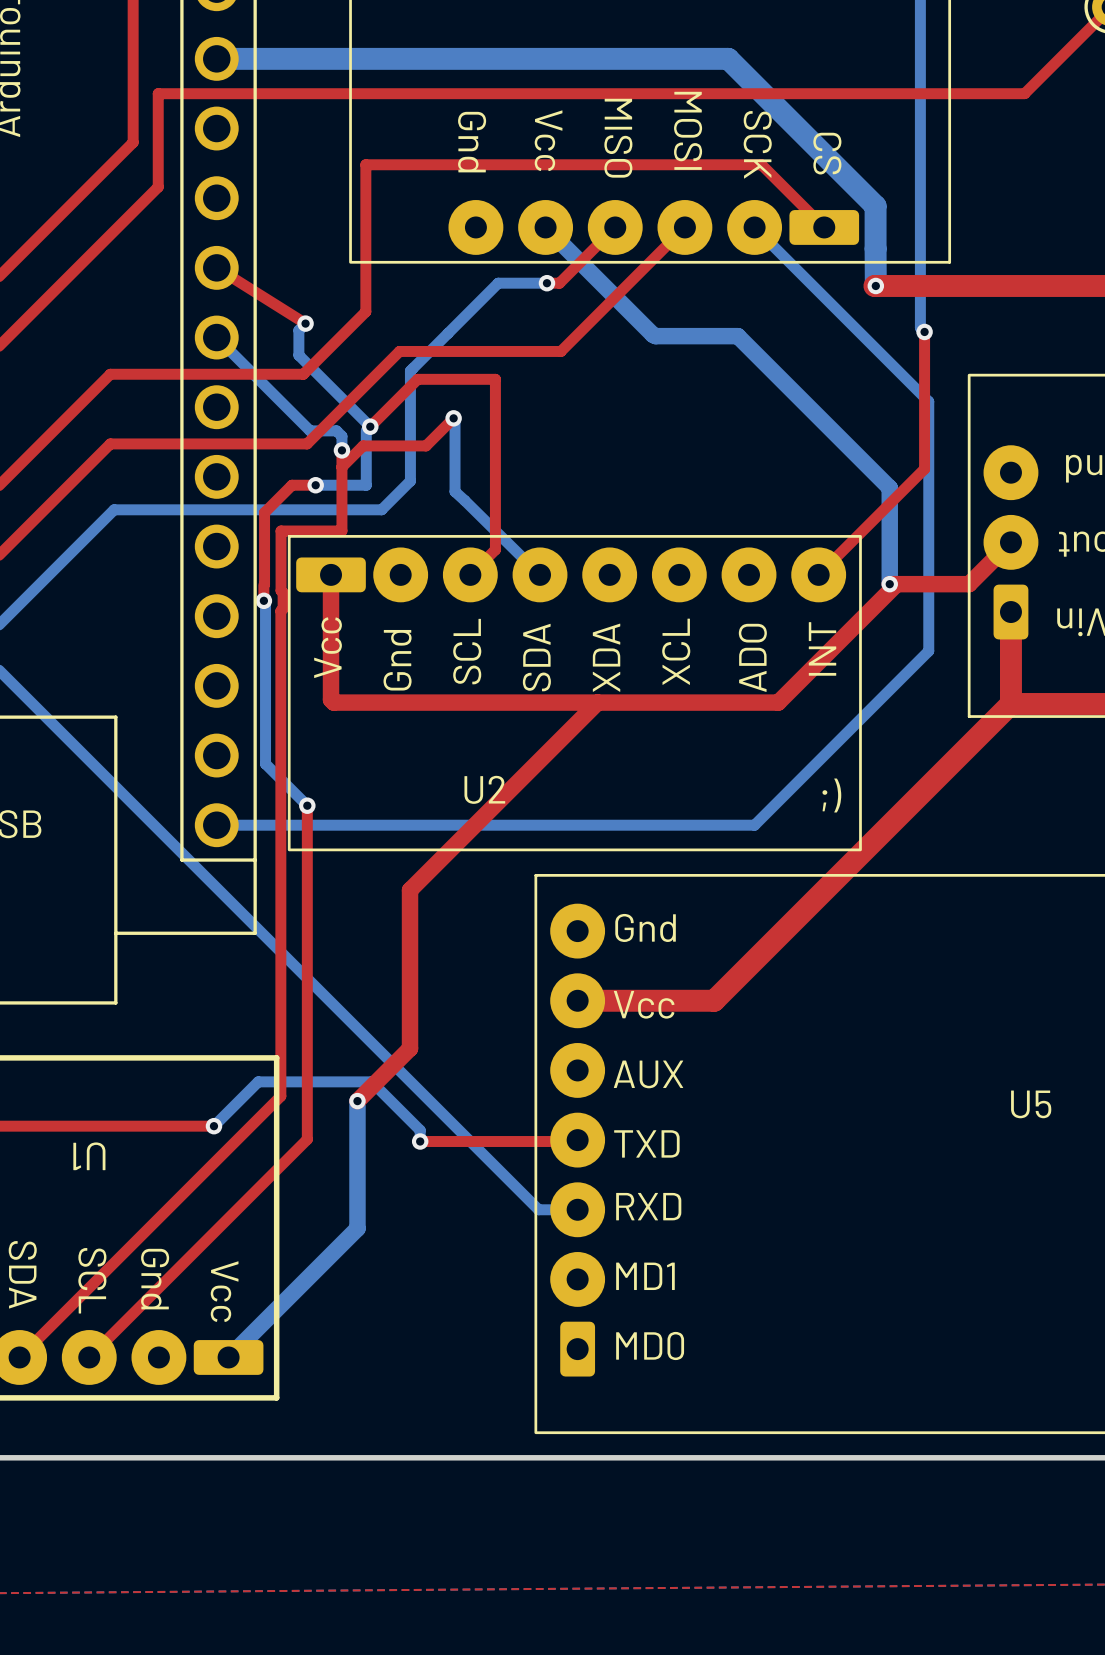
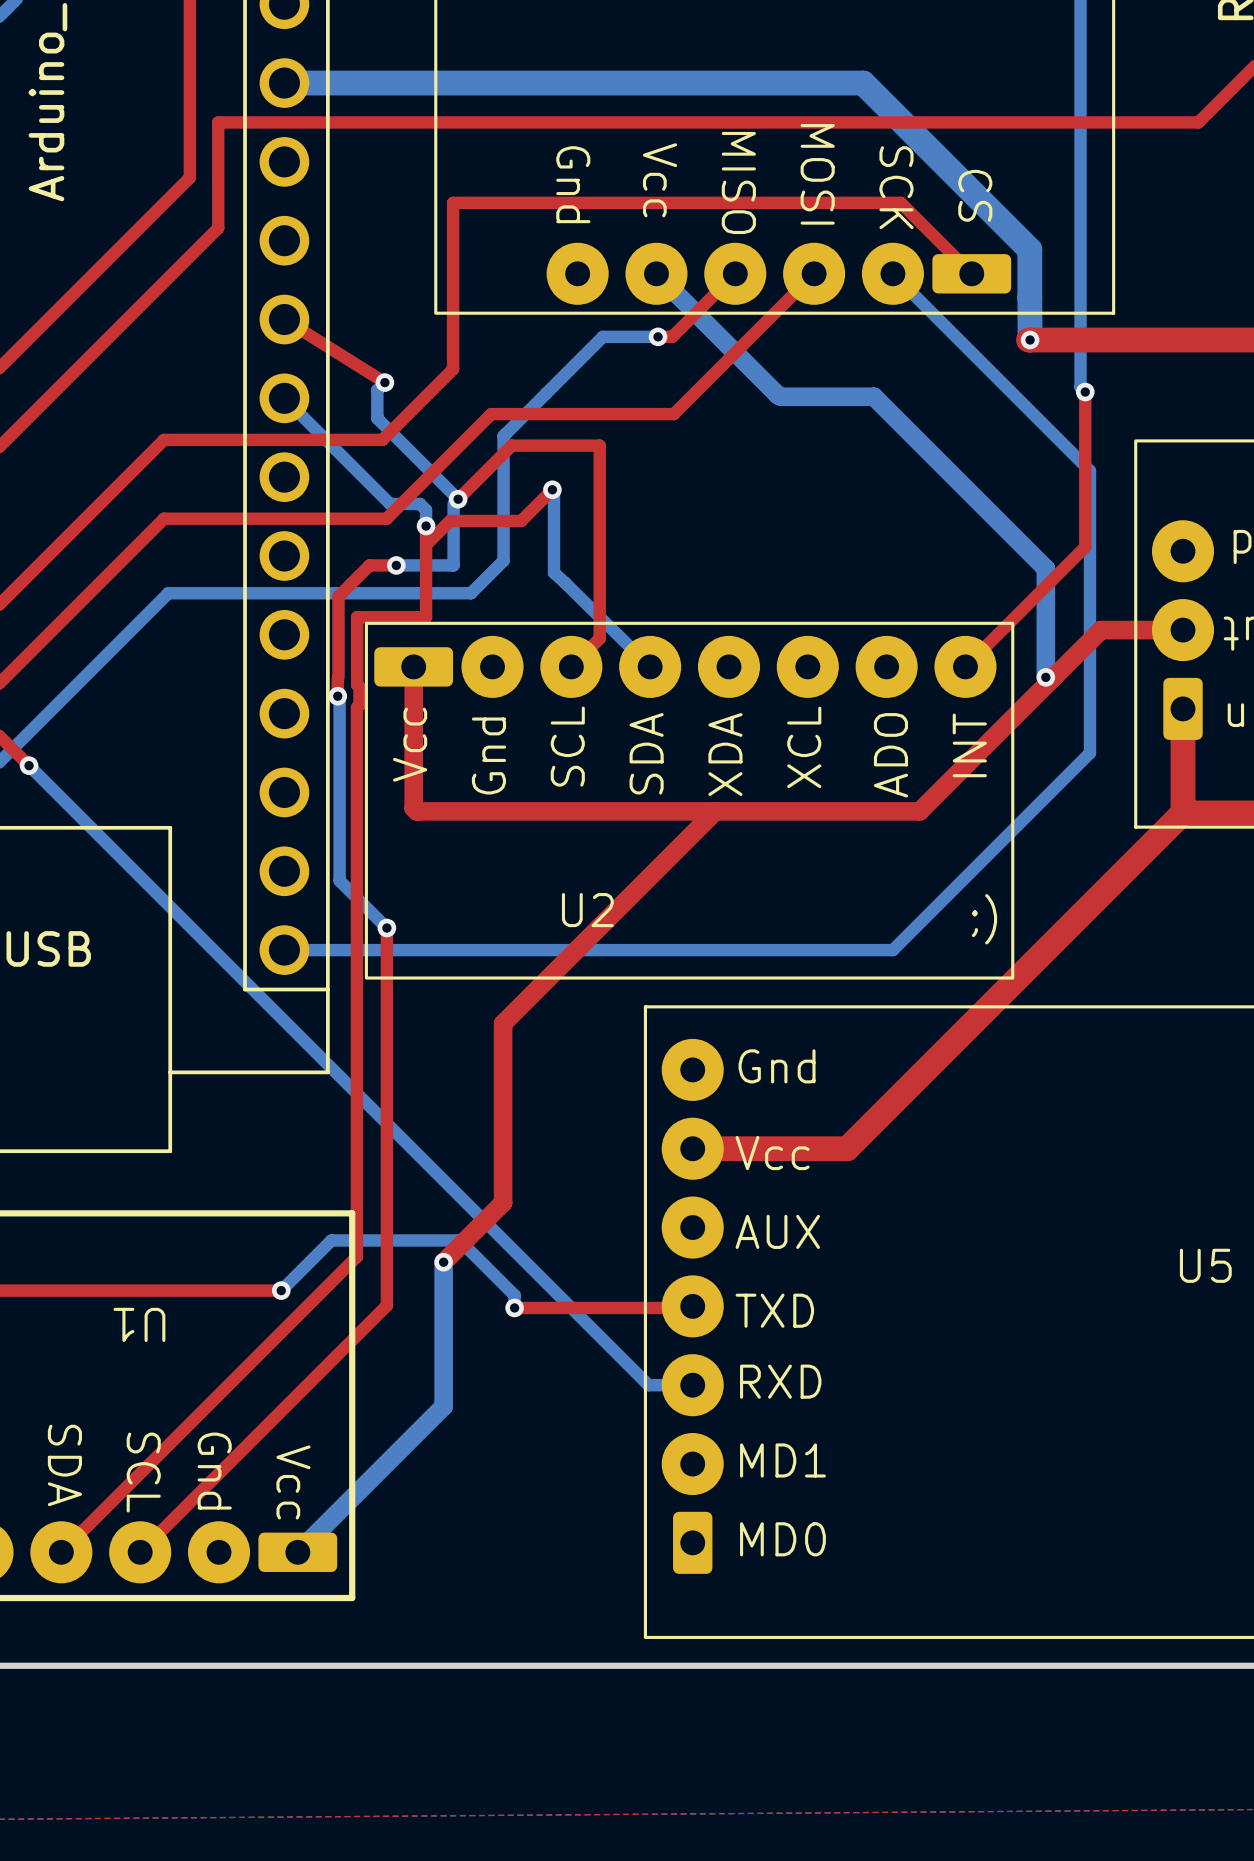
top track: (1010, 542) (969, 584) (896, 584) -> (1183, 630) (1101, 630) (1053, 677)

